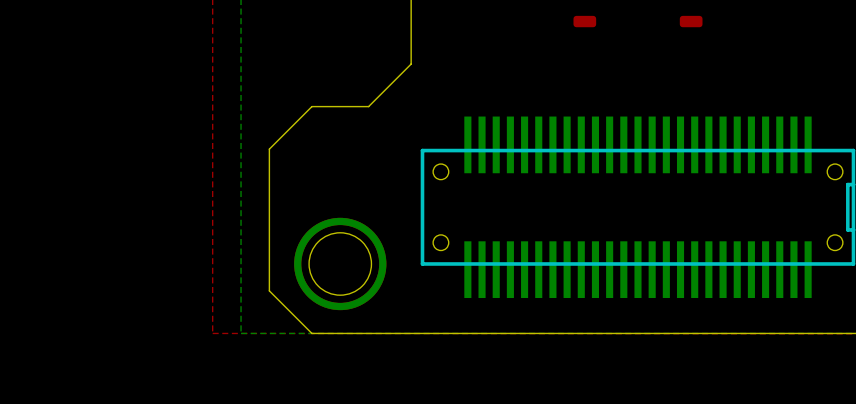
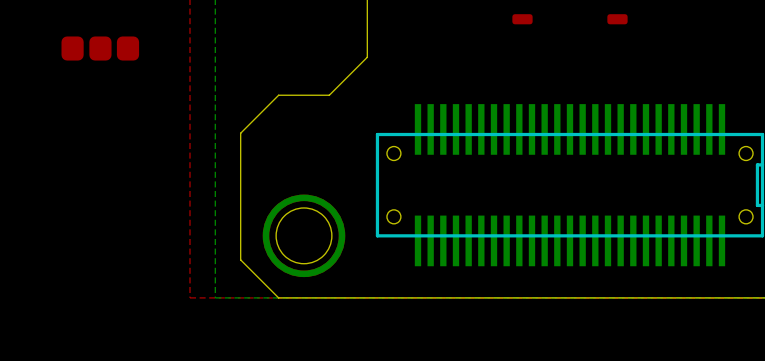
part: none -> (100, 48)

